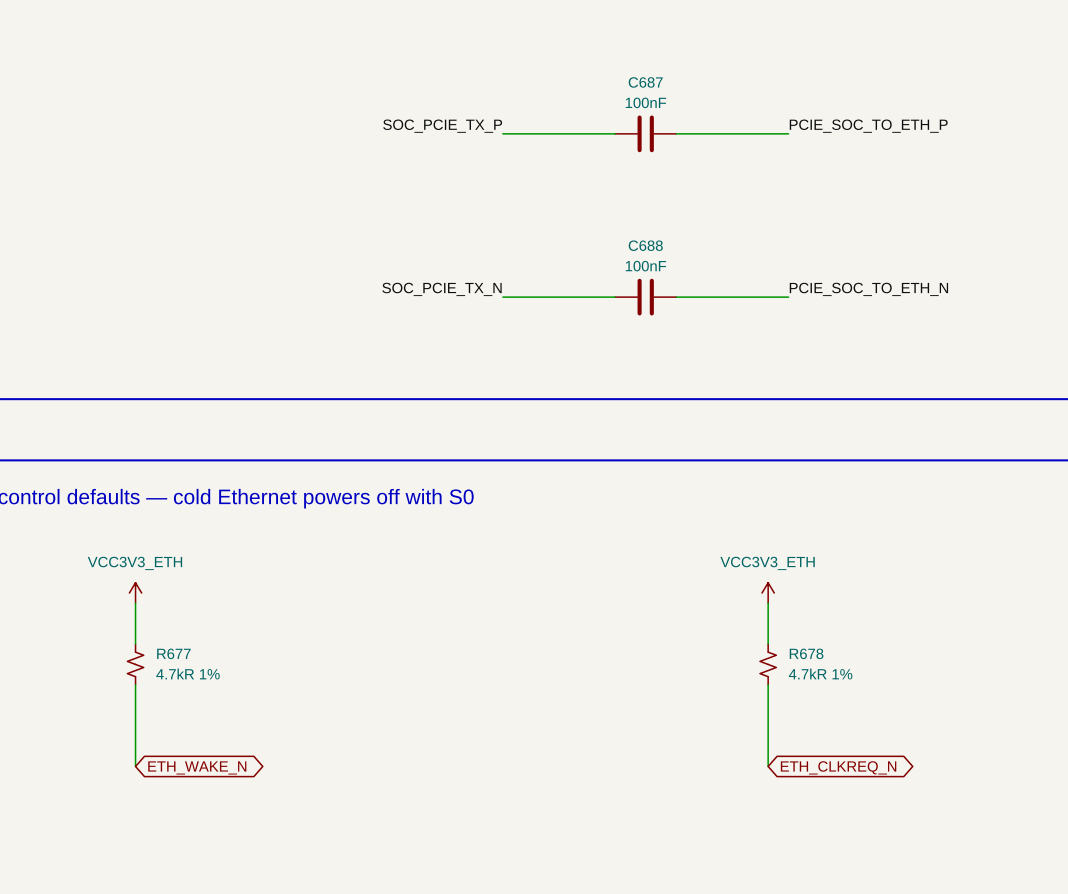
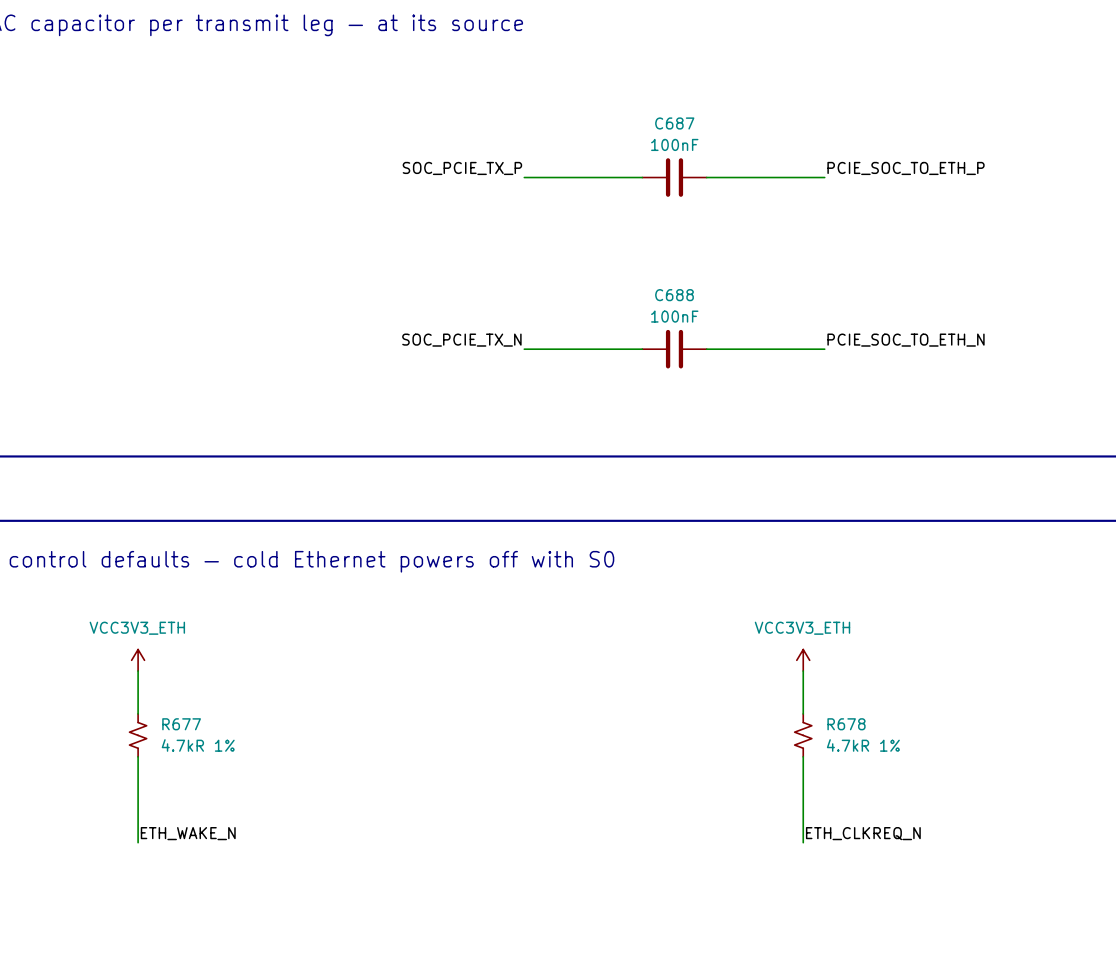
label: none -> ETH_WAKE_N (188, 833)
label: none -> ETH_CLKREQ_N (863, 833)
global label: ETH_WAKE_N (197, 767) -> none
global label: ETH_CLKREQ_N (838, 767) -> none

